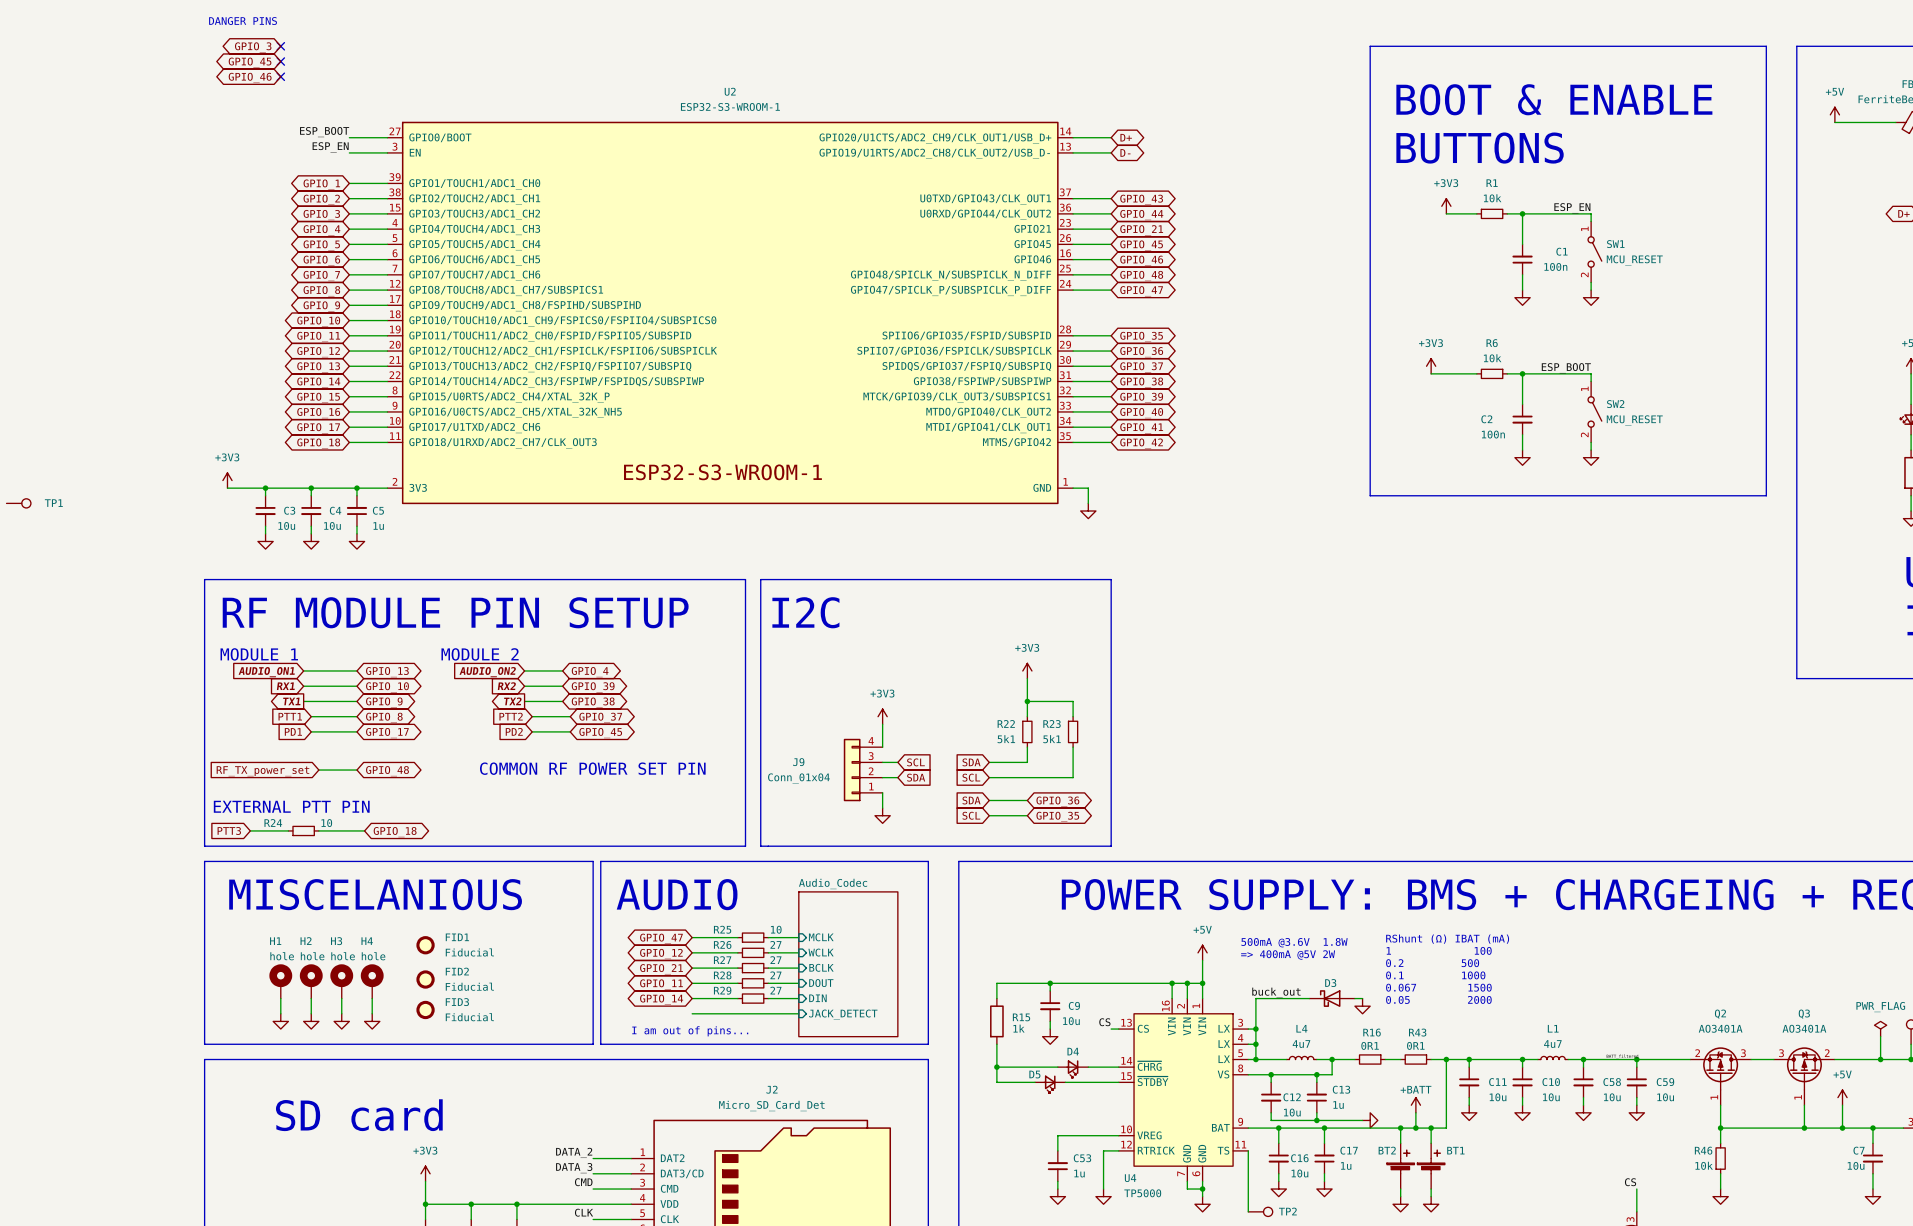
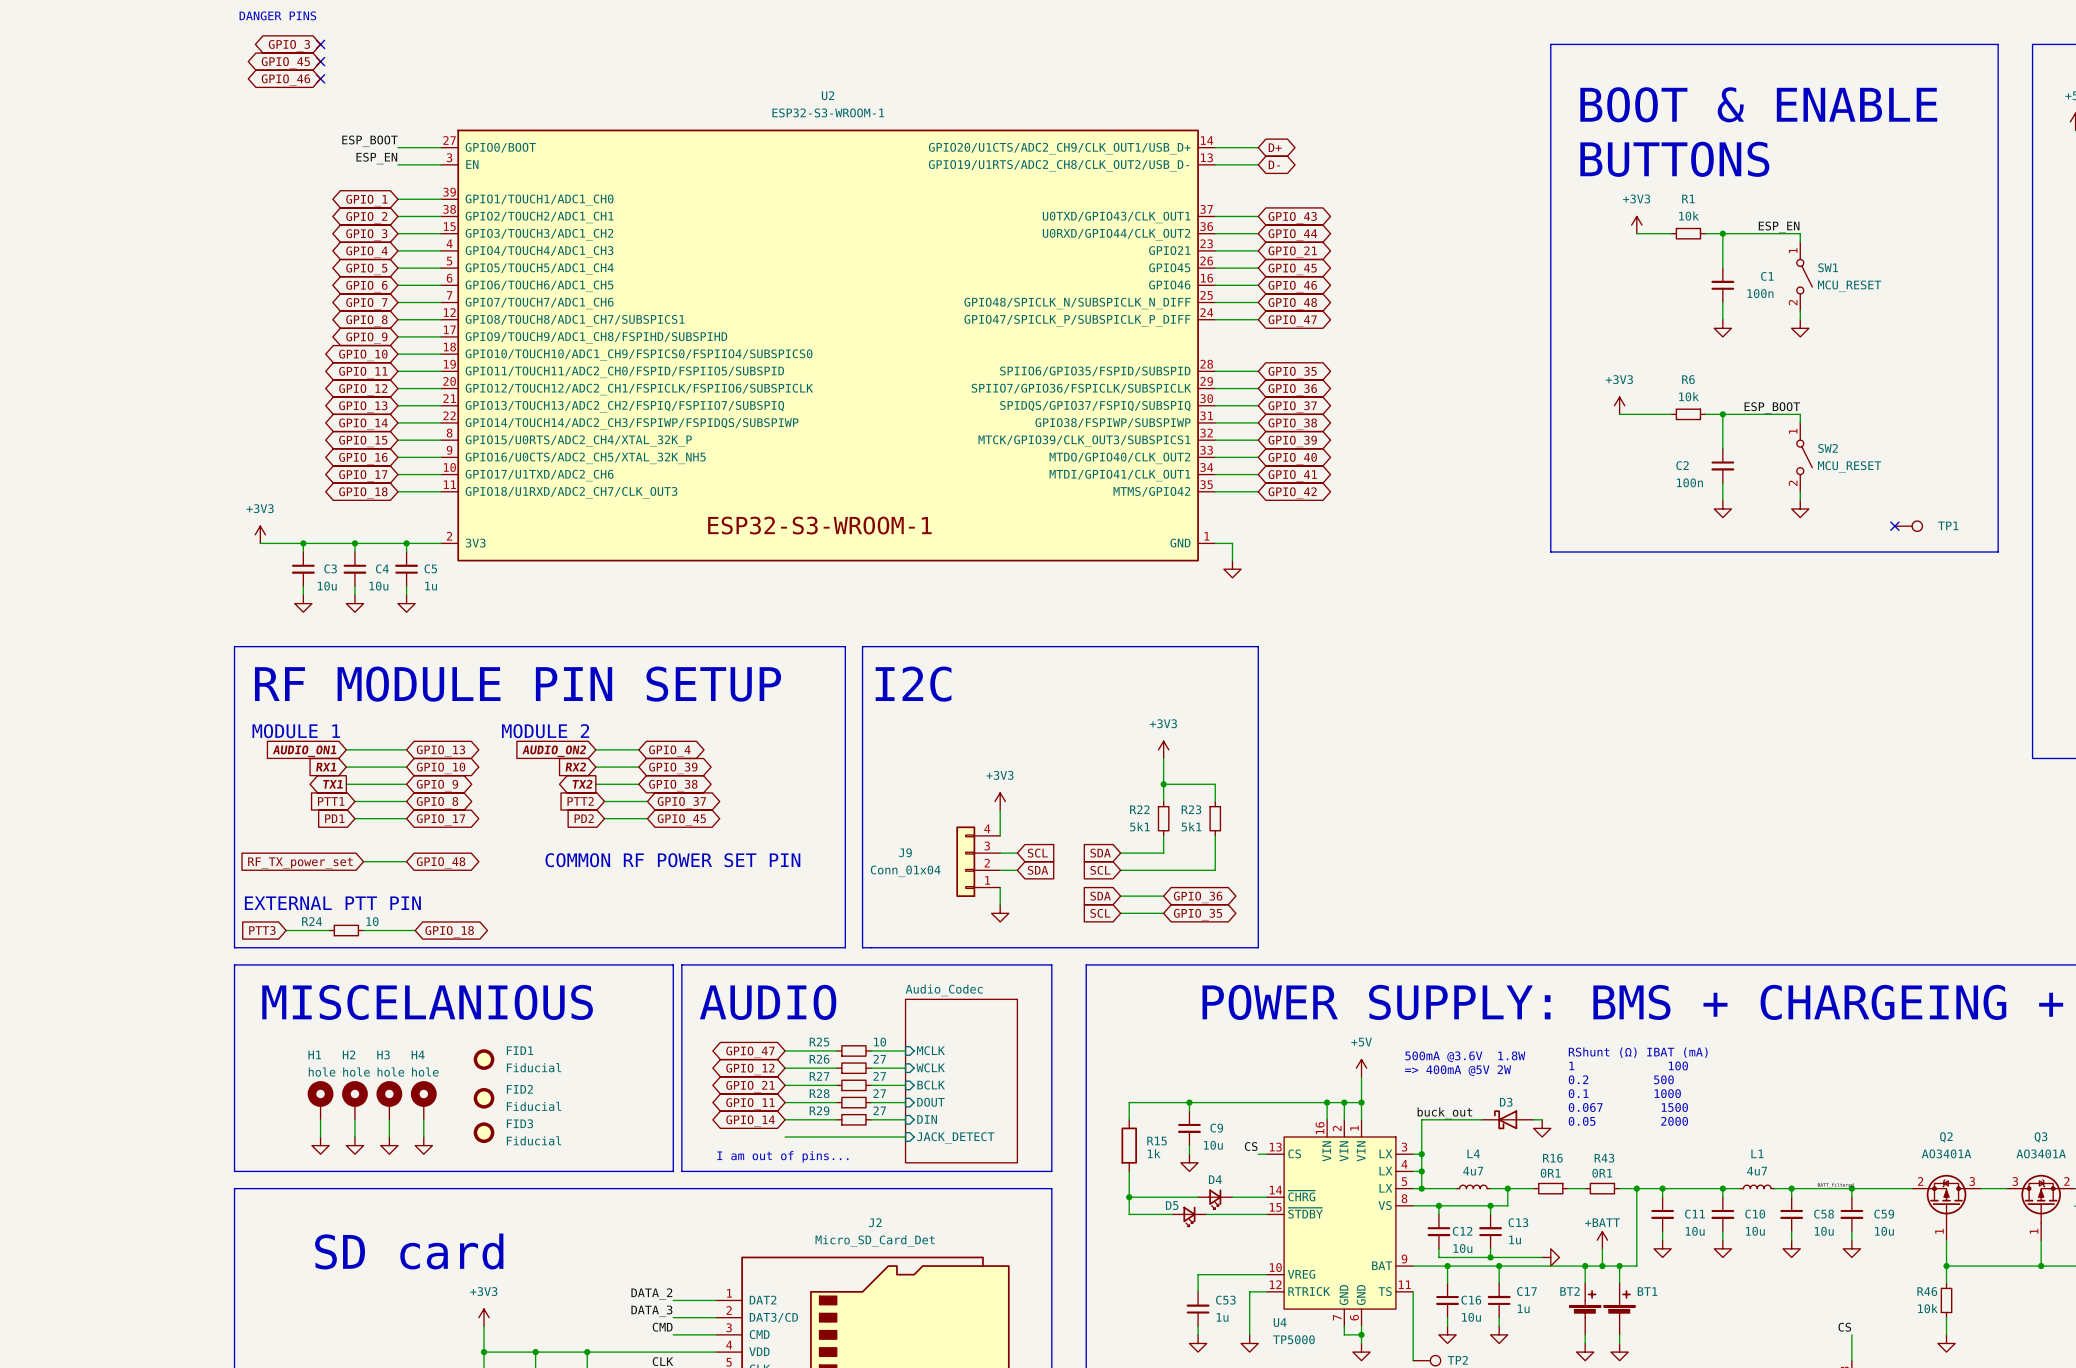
no-connect mark: none -> (1894, 526)
TP1 position: (18, 503) -> (1908, 526)

